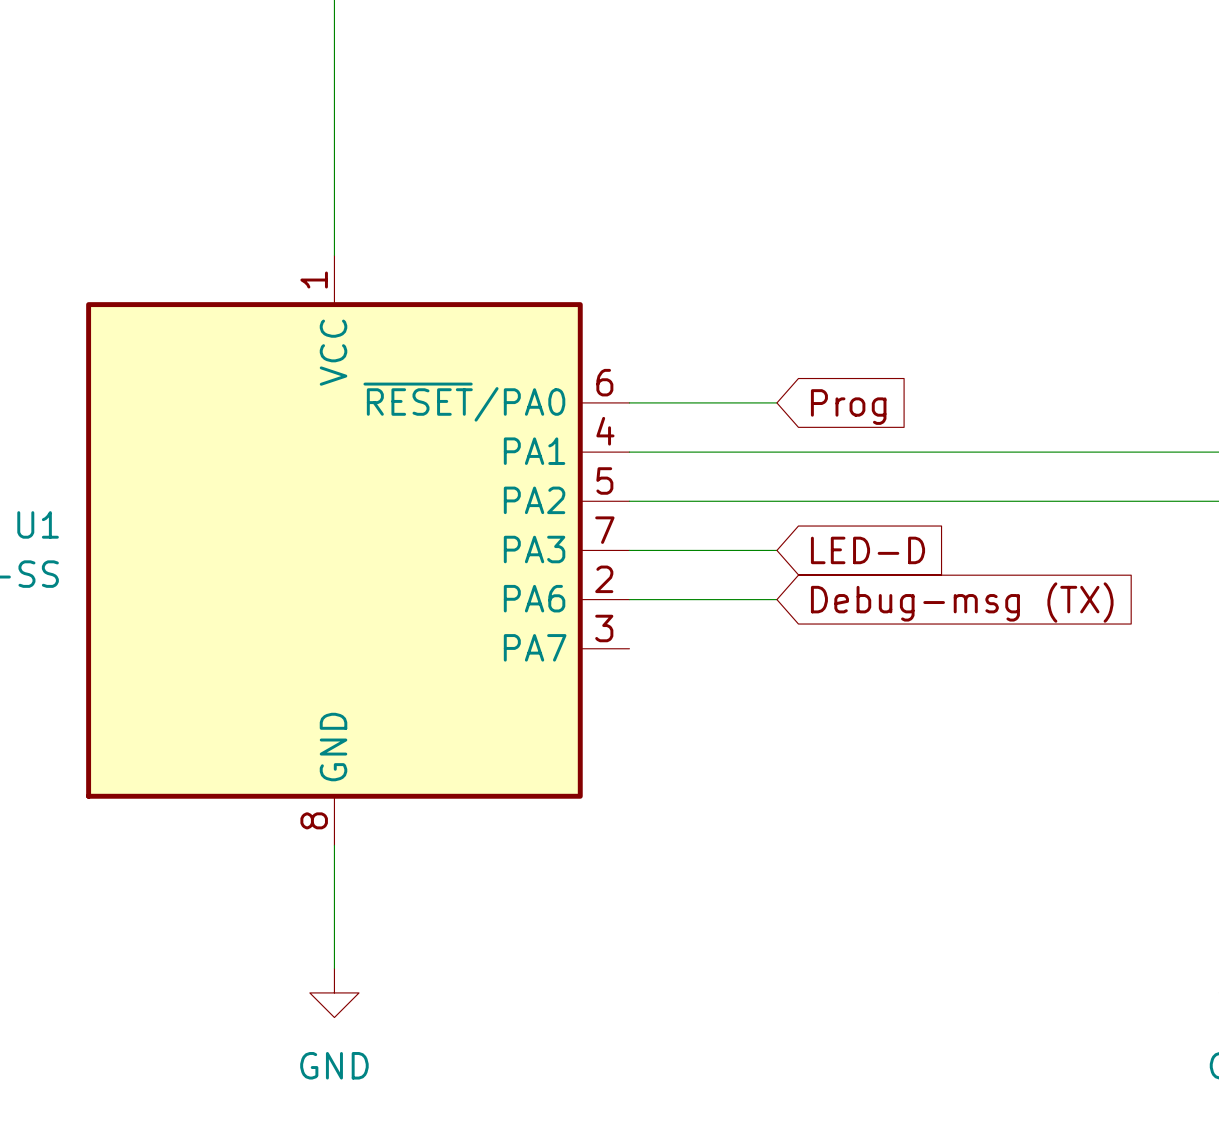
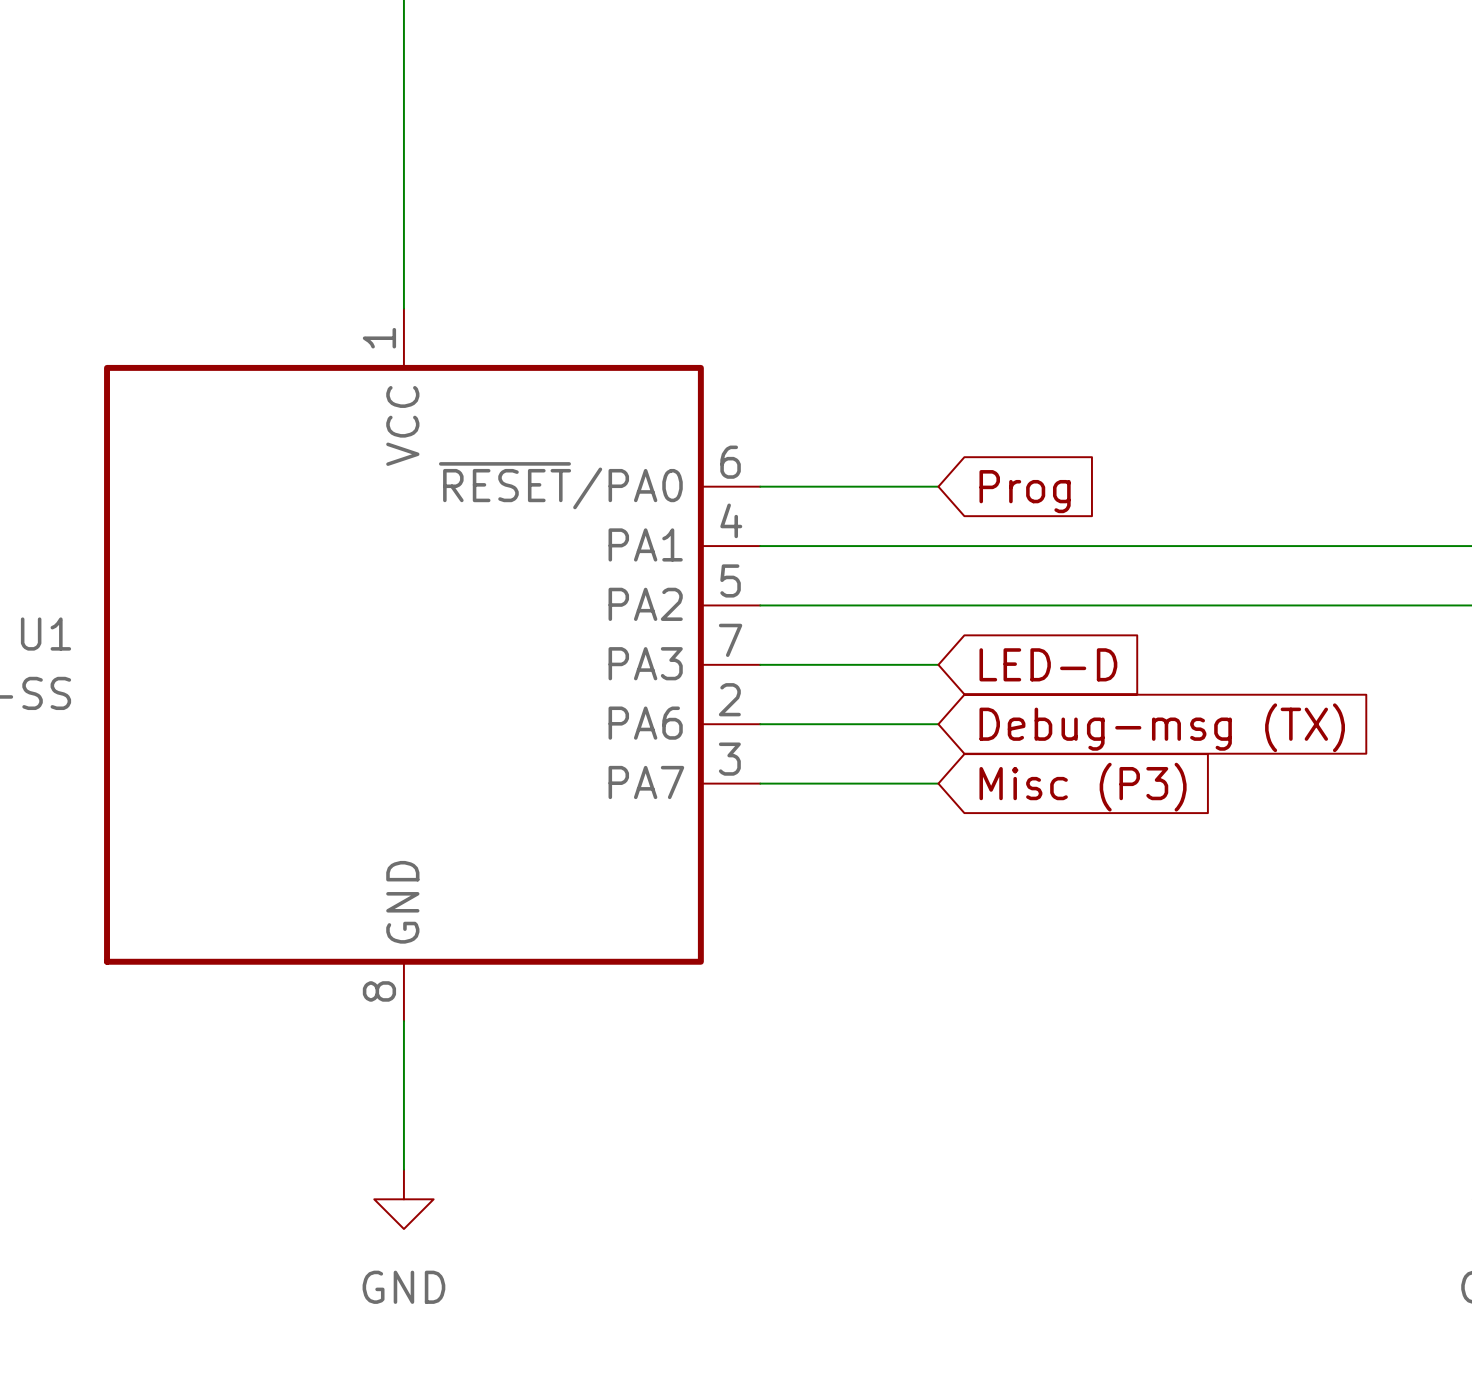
wire: none -> (760, 783) (938, 783)
global label: none -> Misc (P3) (1083, 787)

